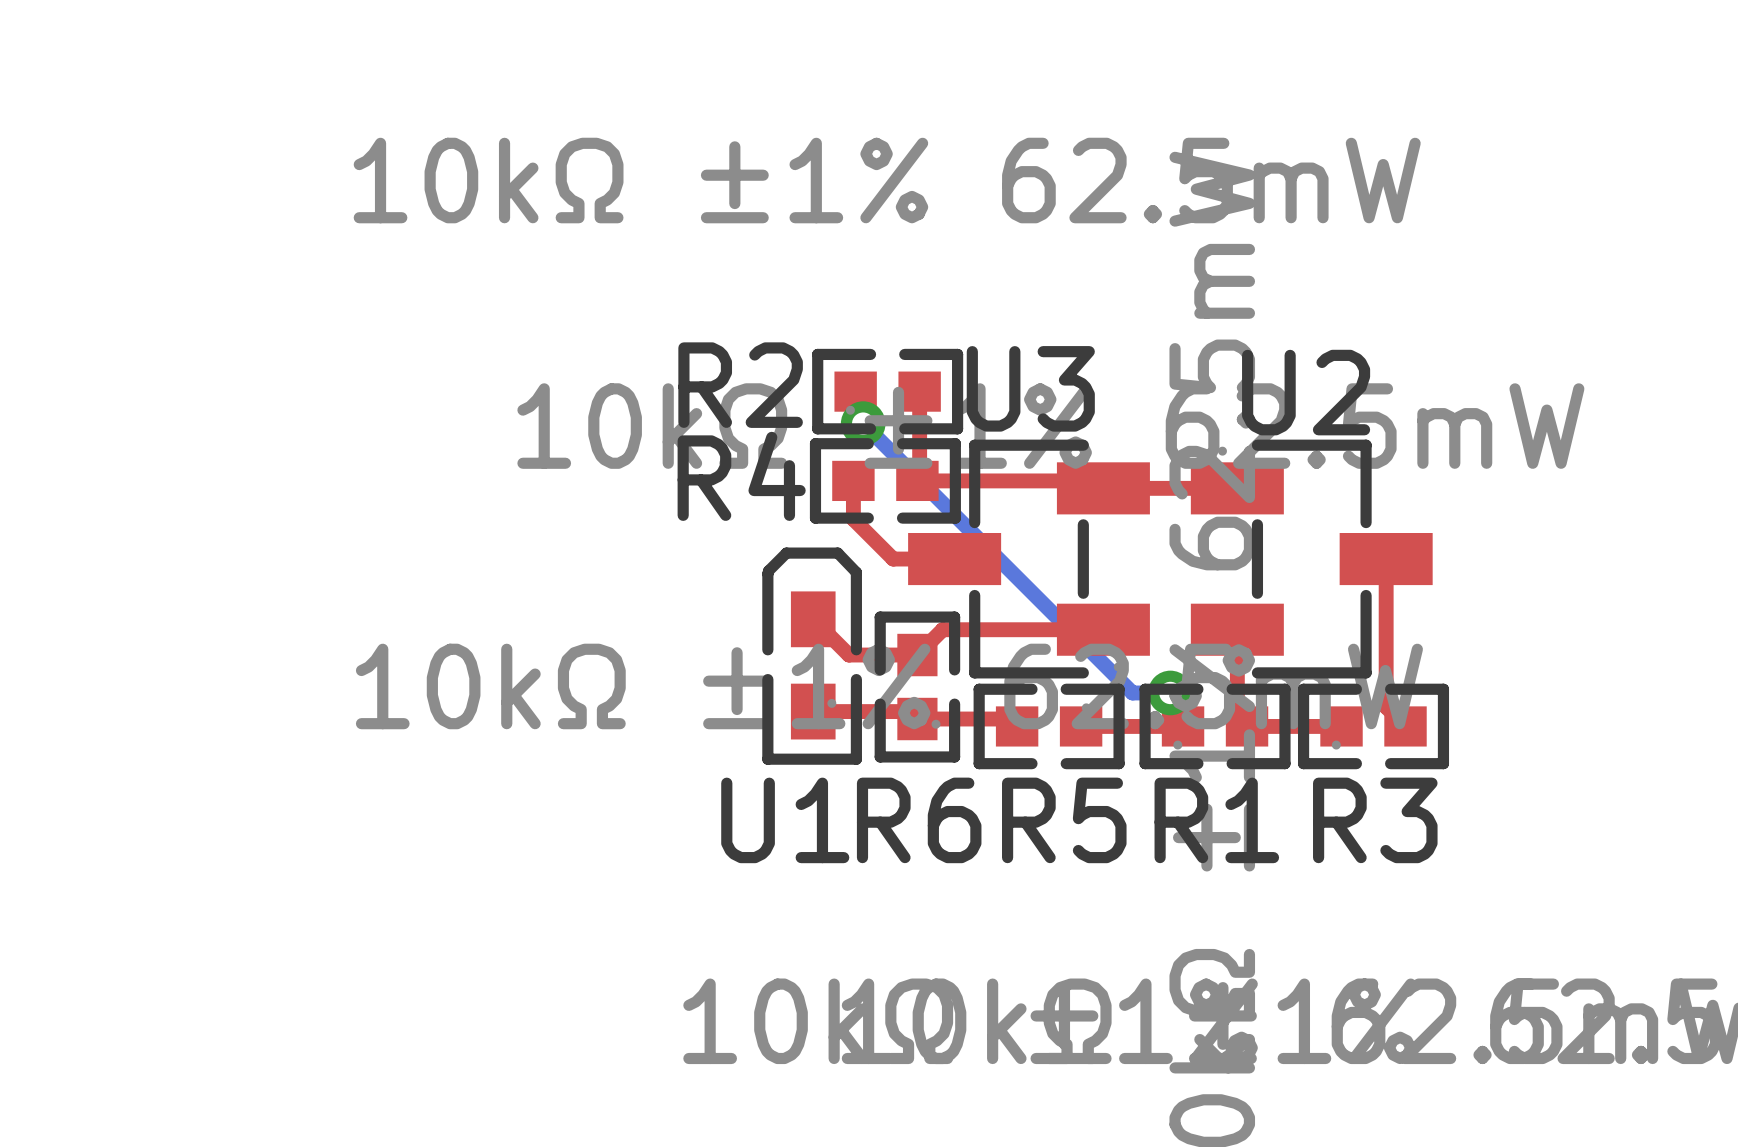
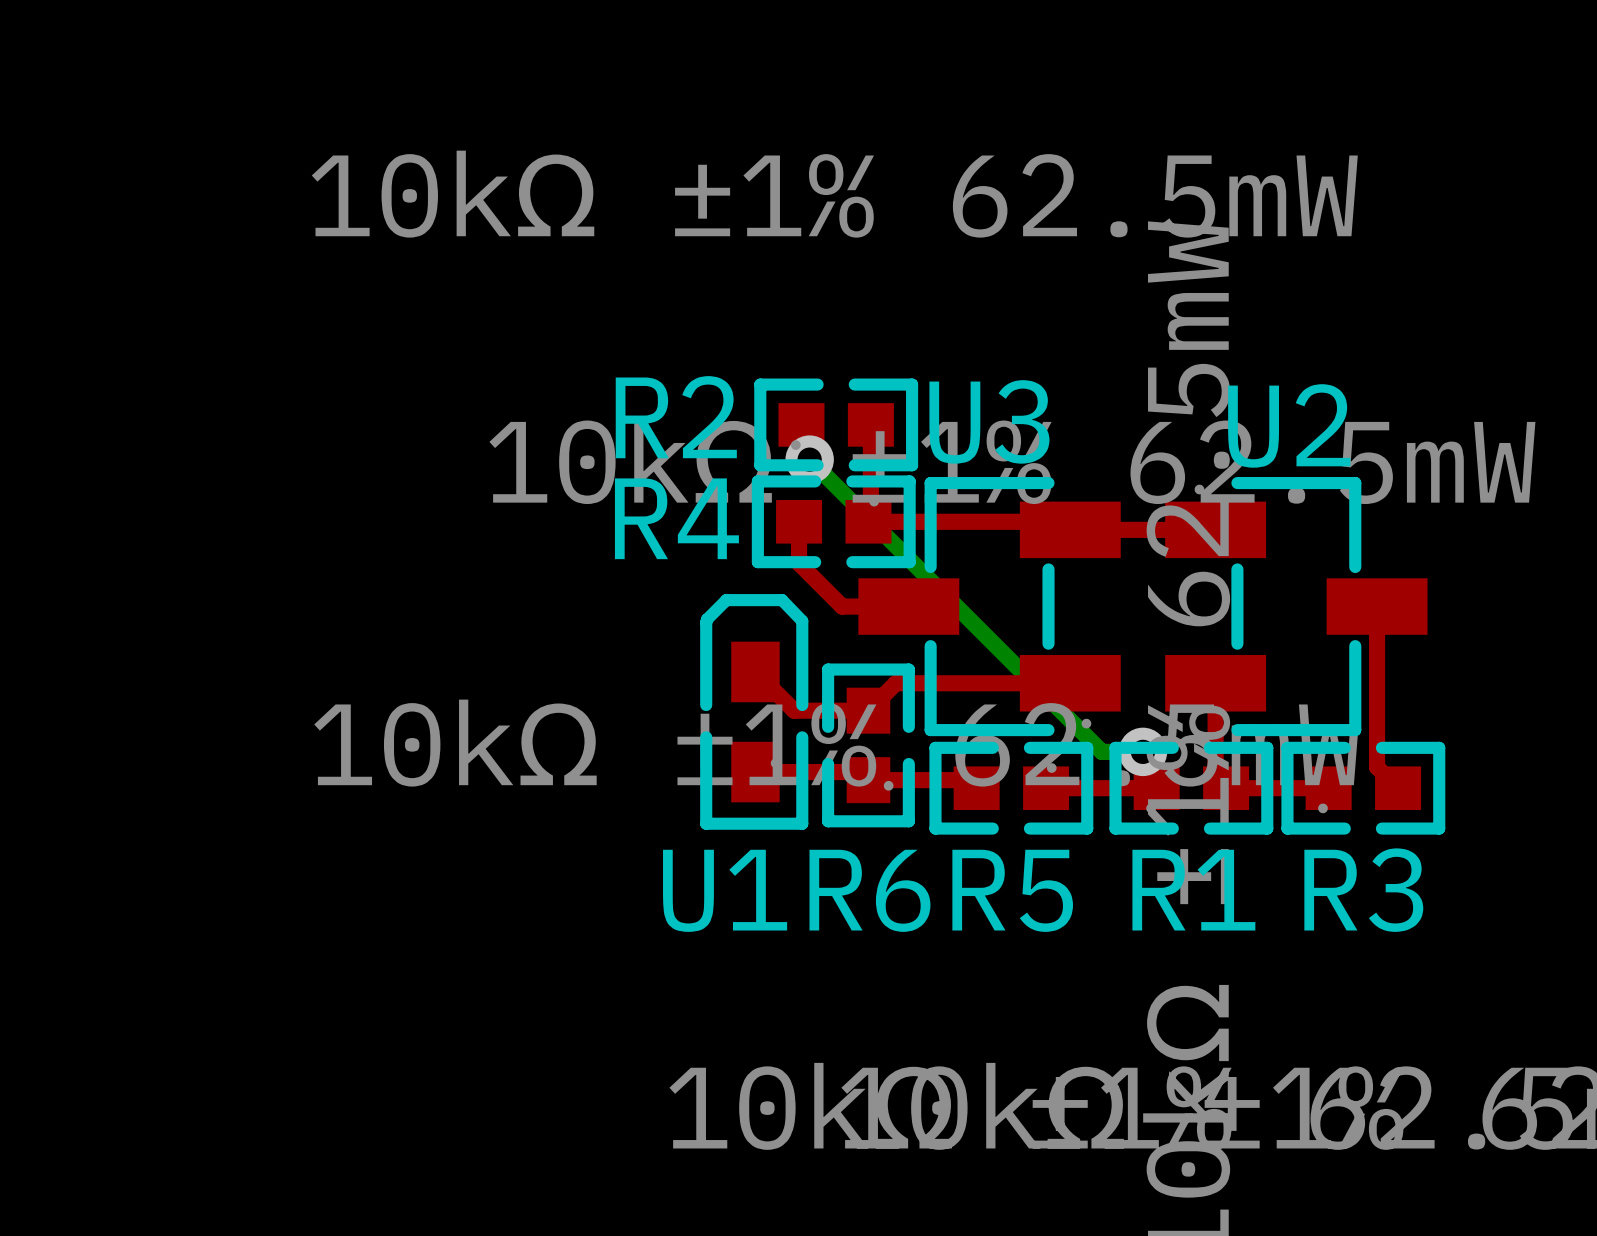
R5 name position: R5 (1064, 820) -> R5 (1012, 890)

